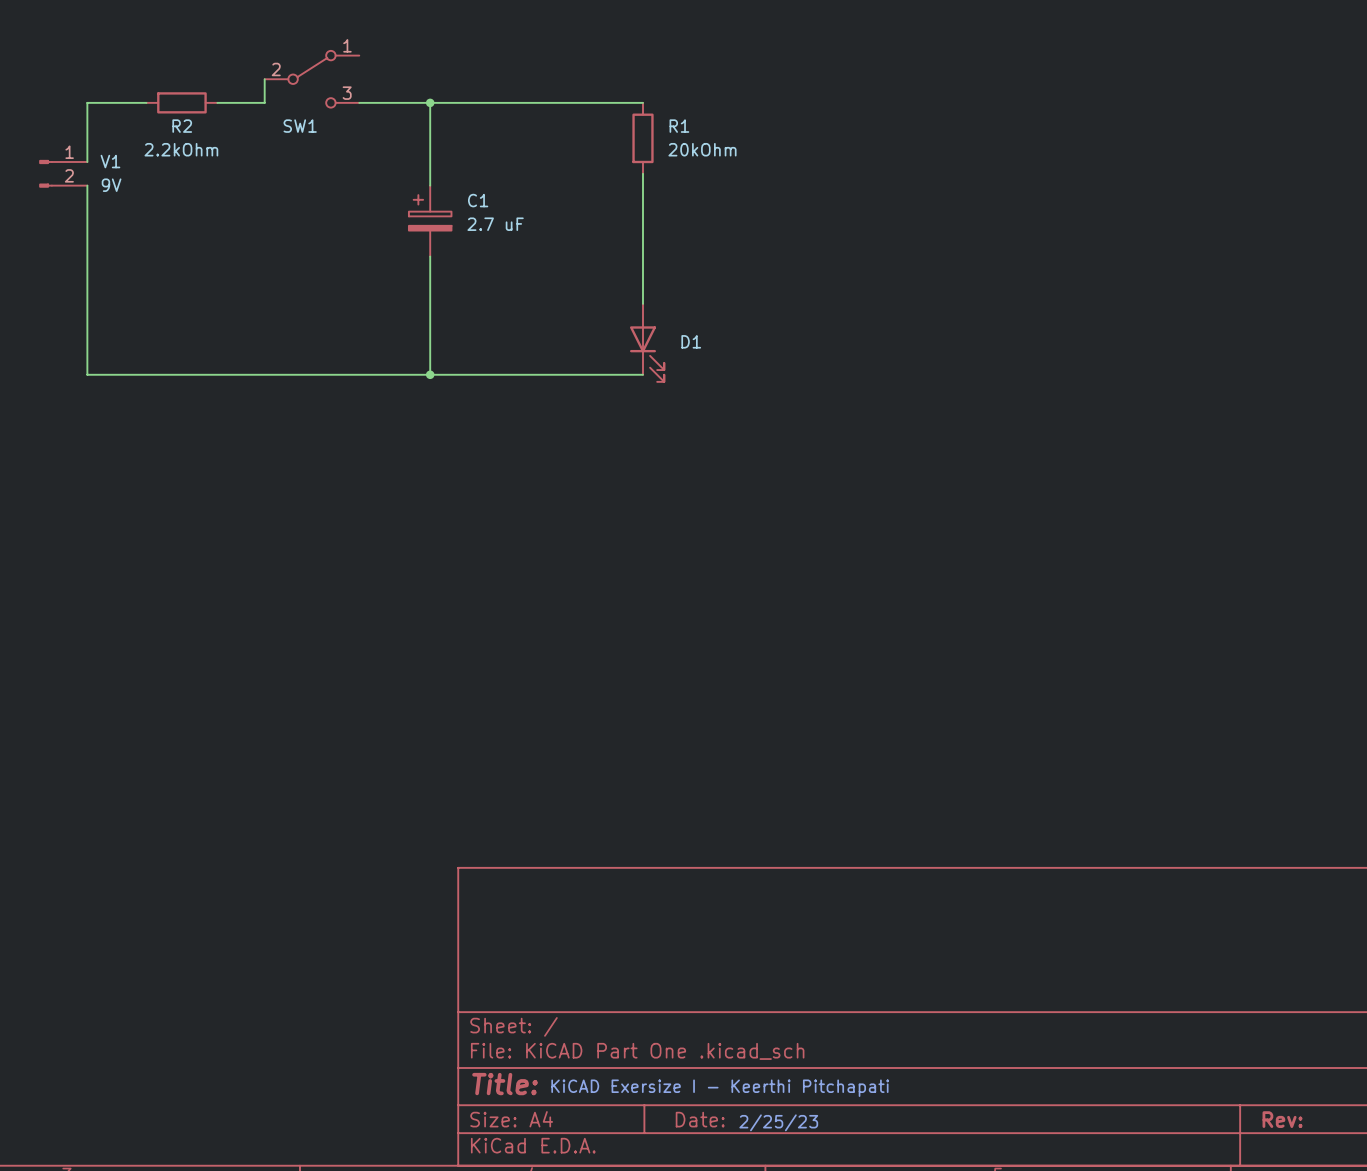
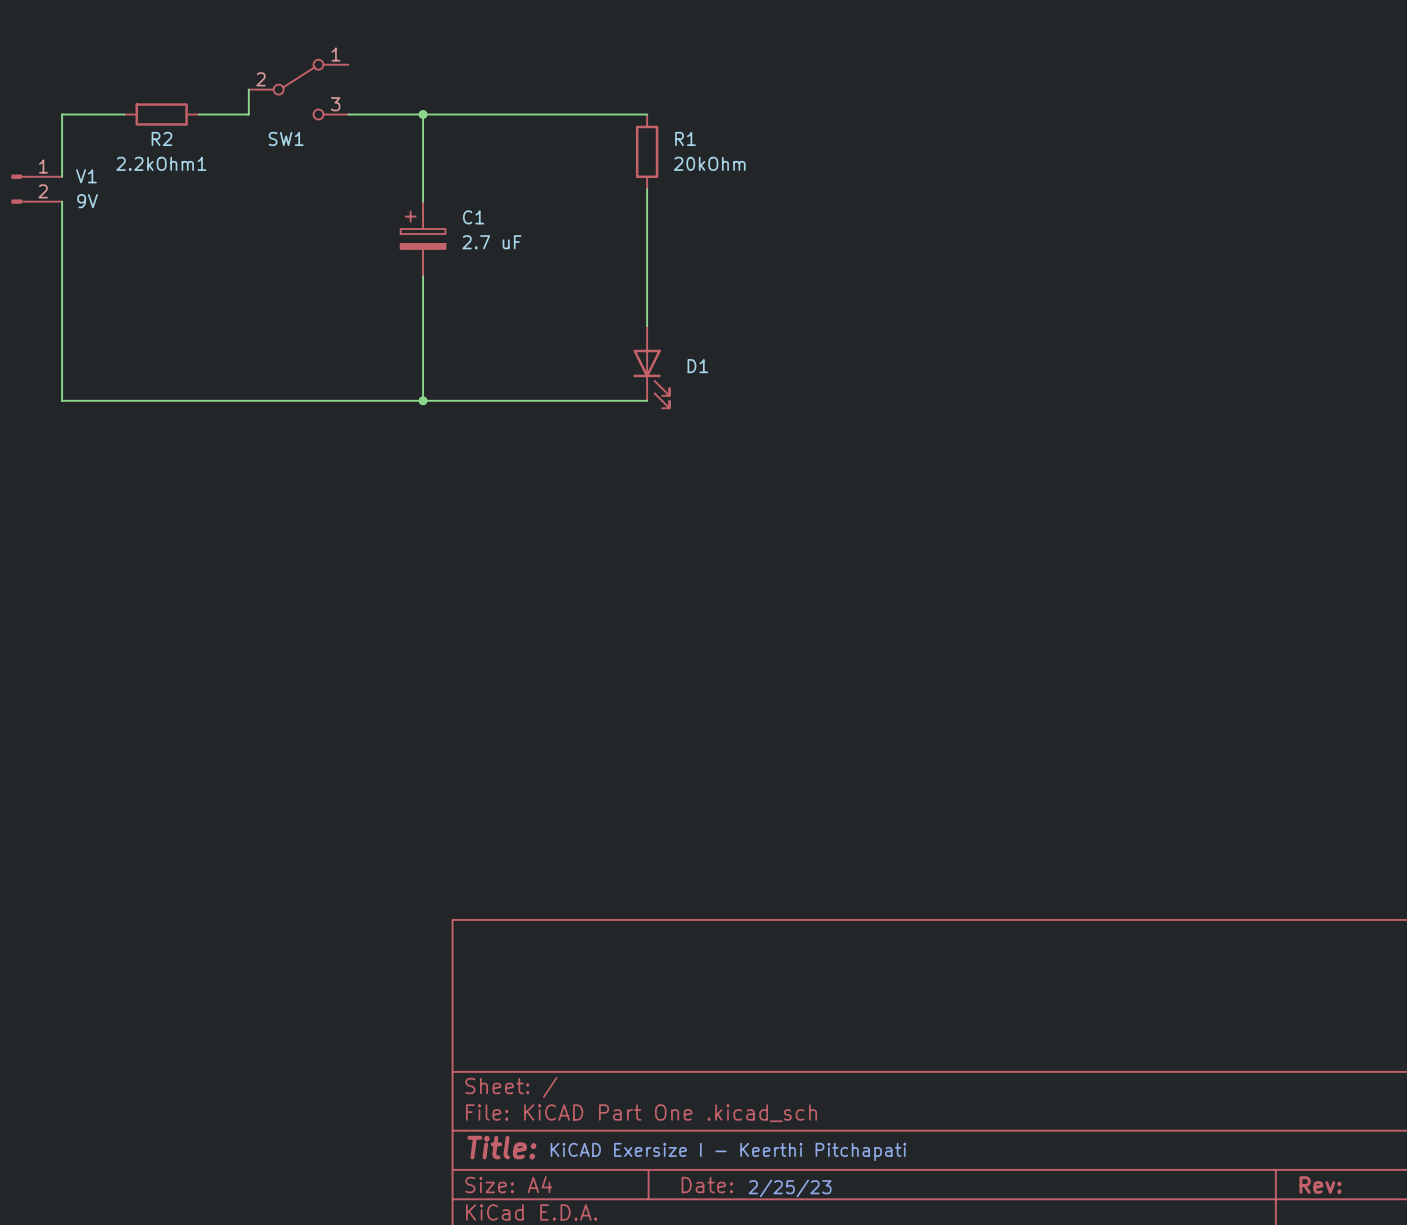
2.2kOhm name: 2.2kOhm (181, 149) -> 2.2kOhm1 (161, 163)

